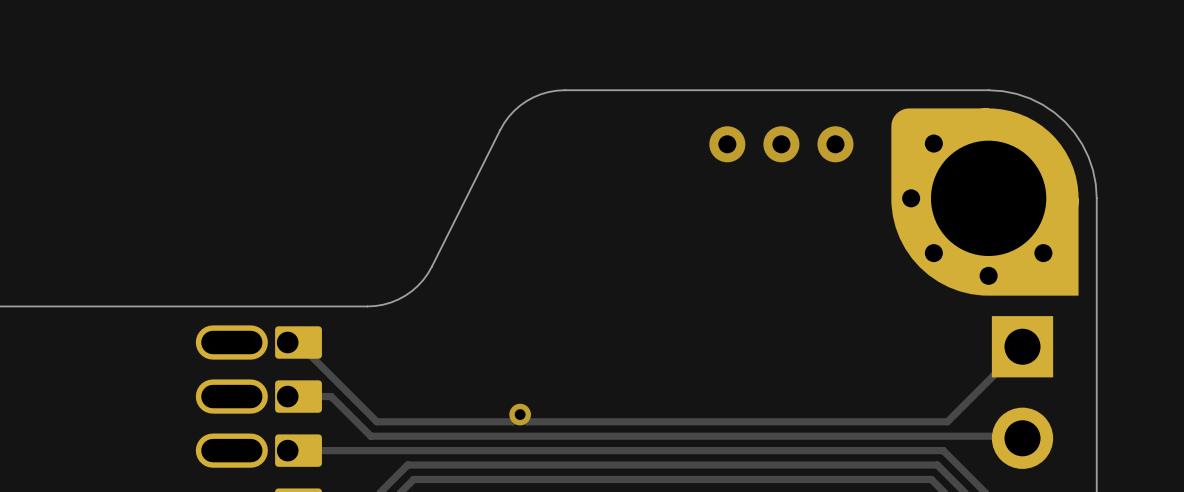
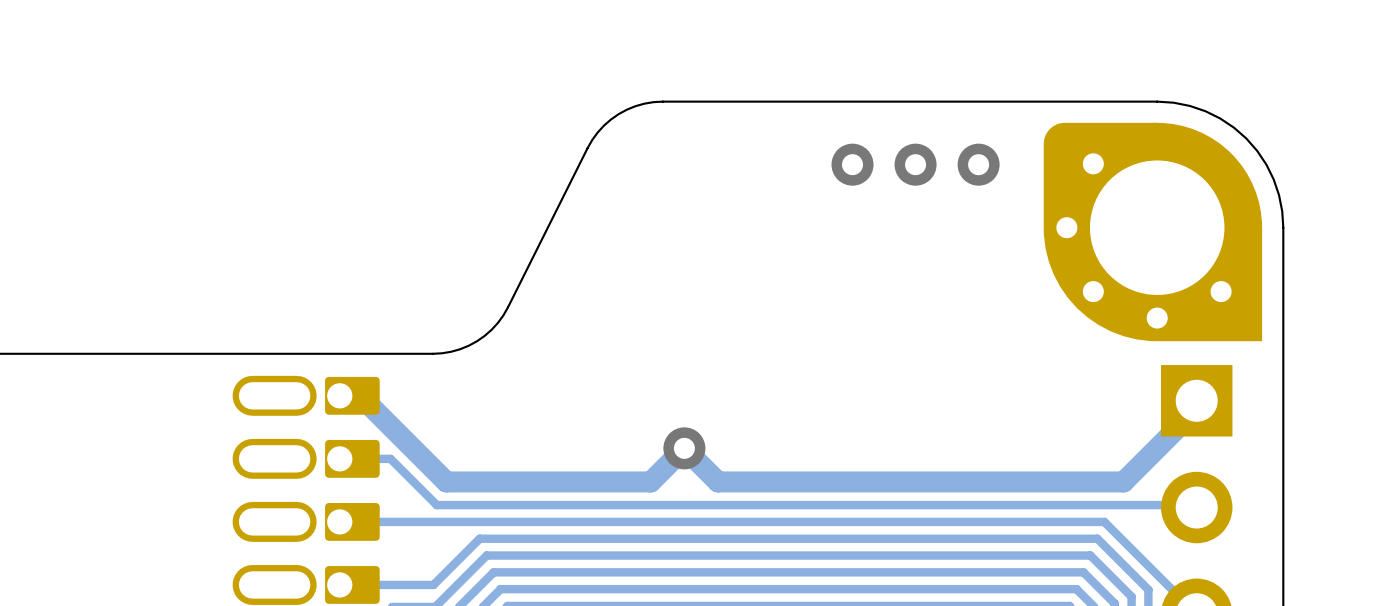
track: (297, 342) (376, 421) (512, 421) (520, 414) (527, 421) (947, 421) (1022, 346) -> (351, 395) (360, 395) (446, 481) (650, 481) (684, 448) (717, 481) (1123, 481) (1196, 408) (1196, 400)
via: none -> (684, 448)
via: (520, 414) -> none

